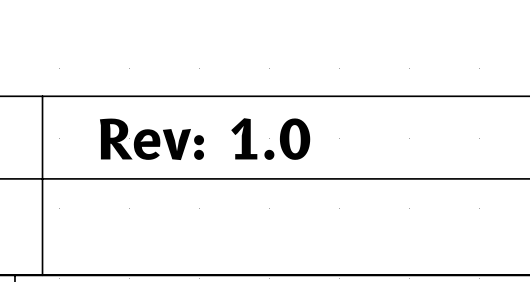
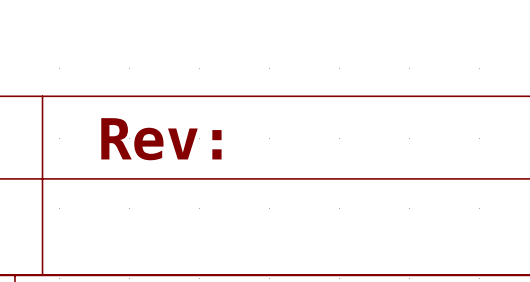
title block: Rev: 1.0 (205, 139) -> Rev: (161, 139)

